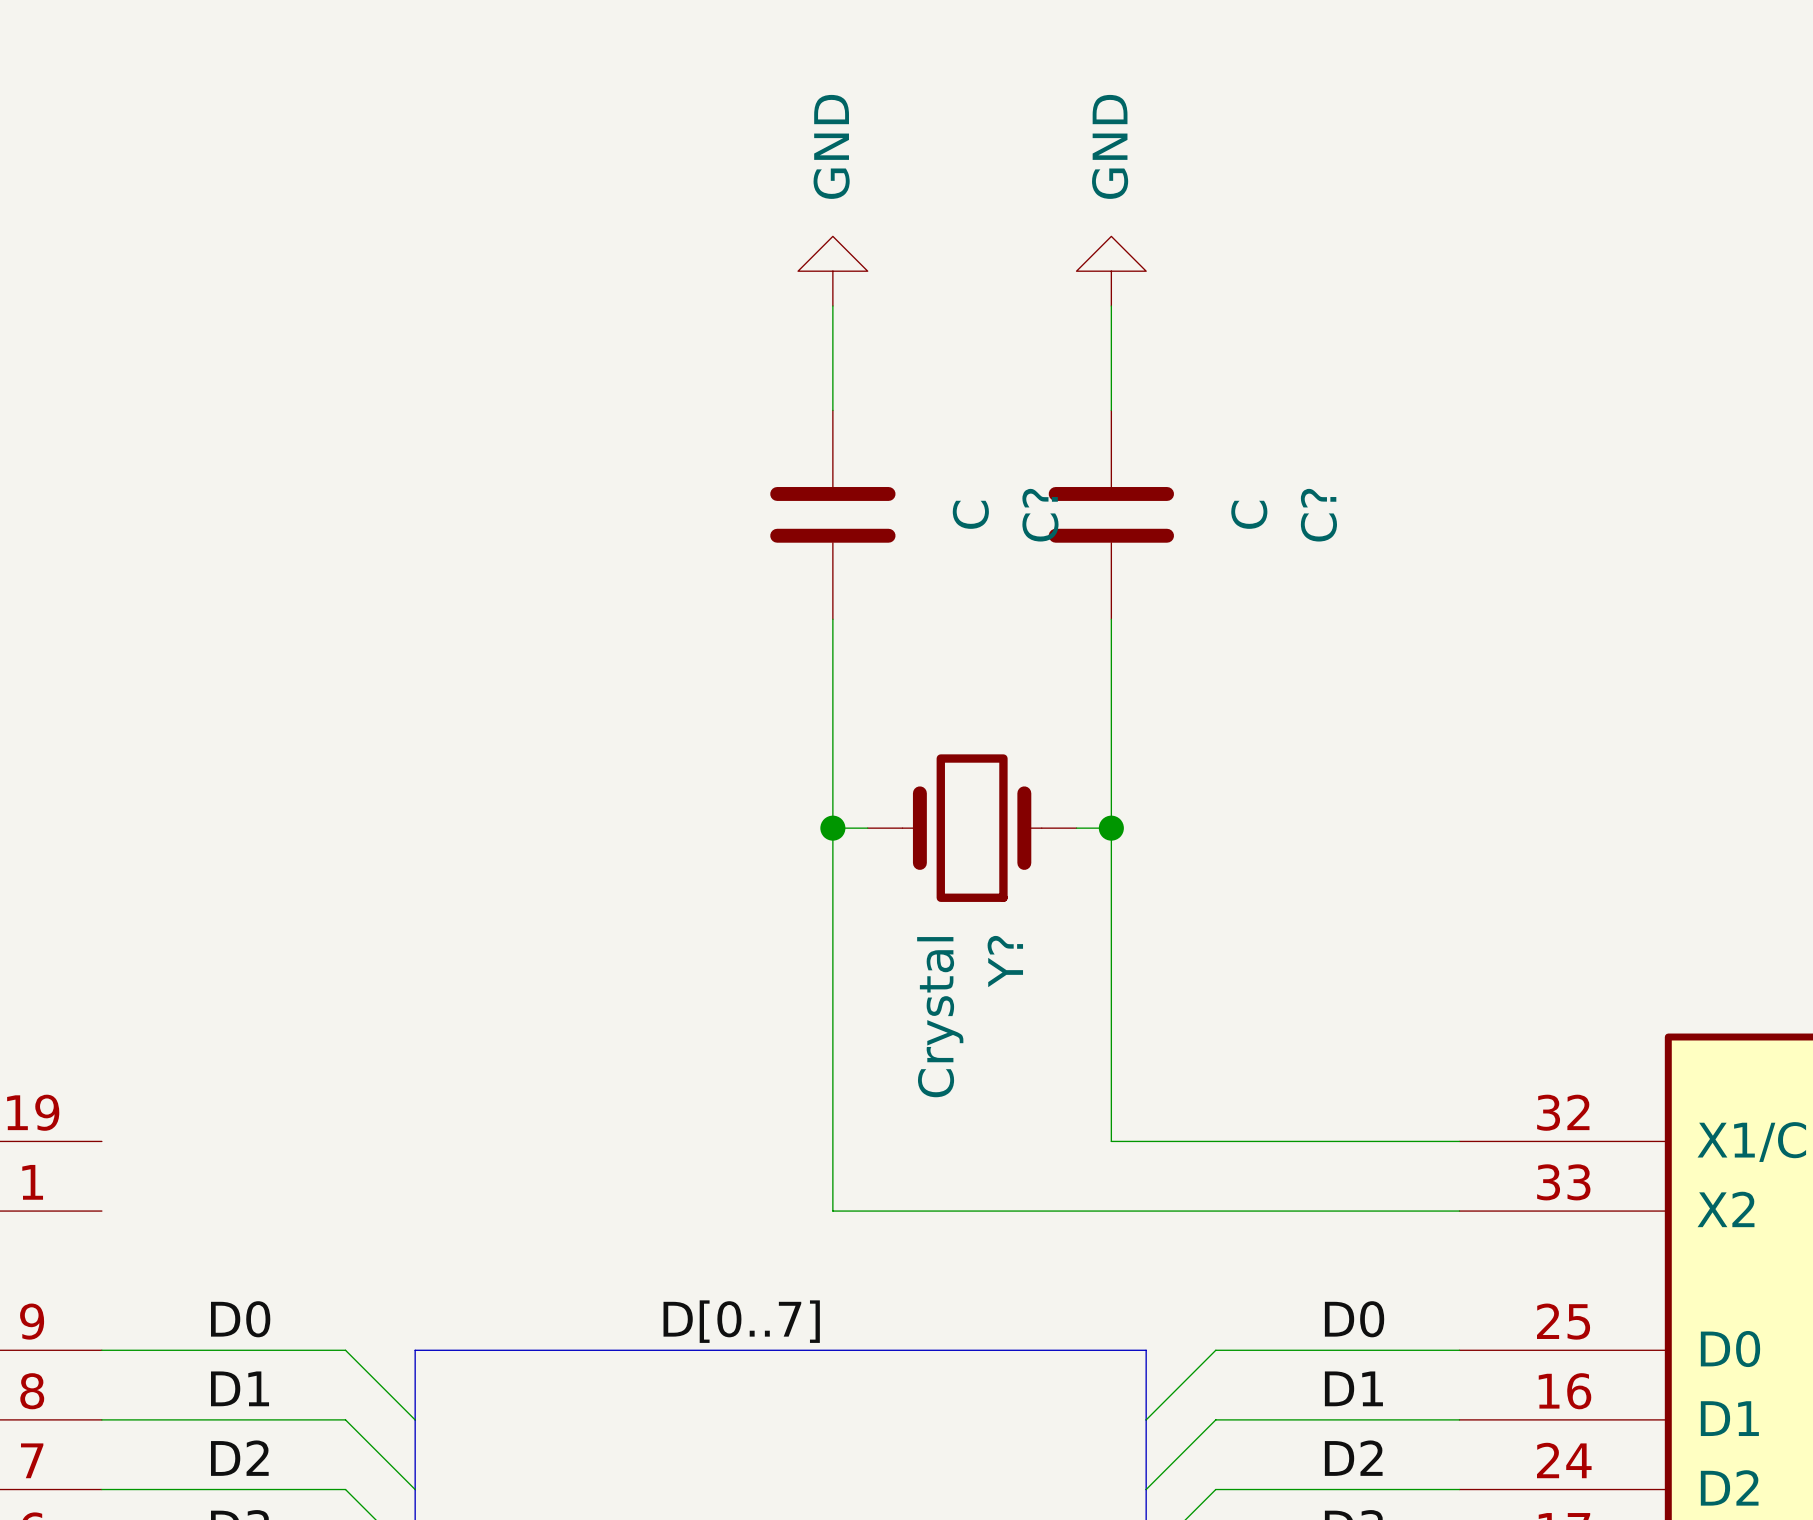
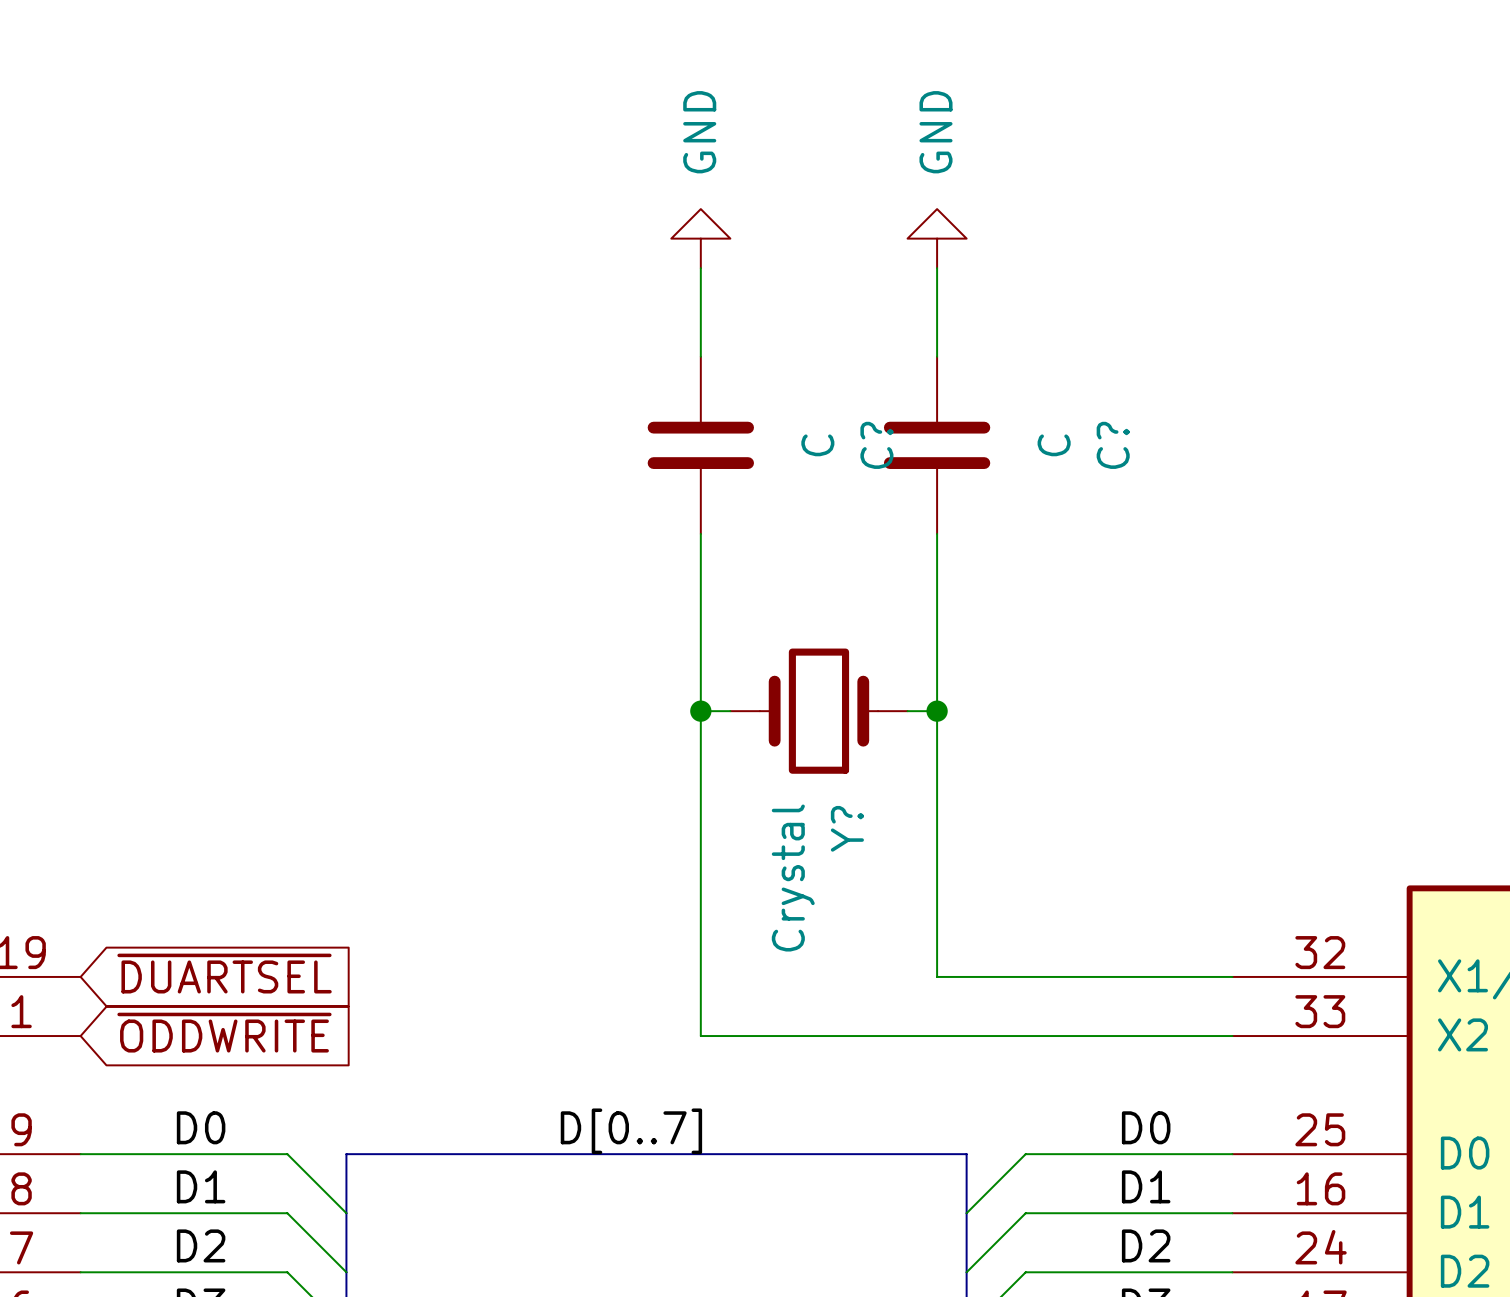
global label: none -> ~{DUARTSEL} (224, 973)
global label: none -> ~{ODDWRITE} (224, 1032)

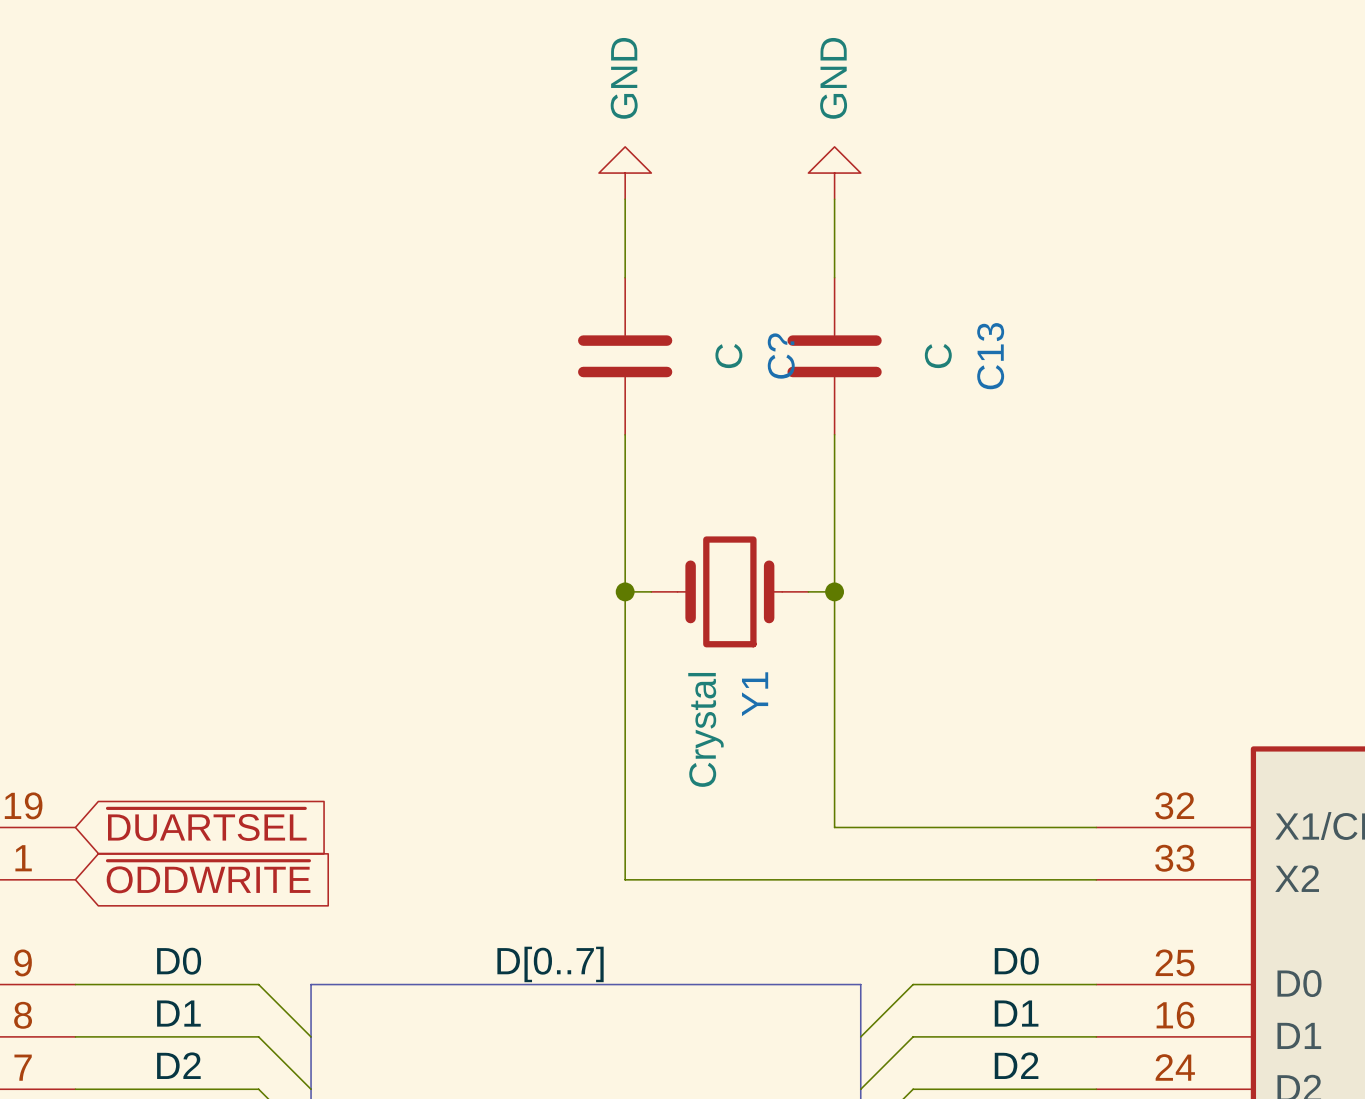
C? name: C? (1113, 445) -> C13 (990, 356)
Y? name: Y? (847, 828) -> Y1 (755, 694)

